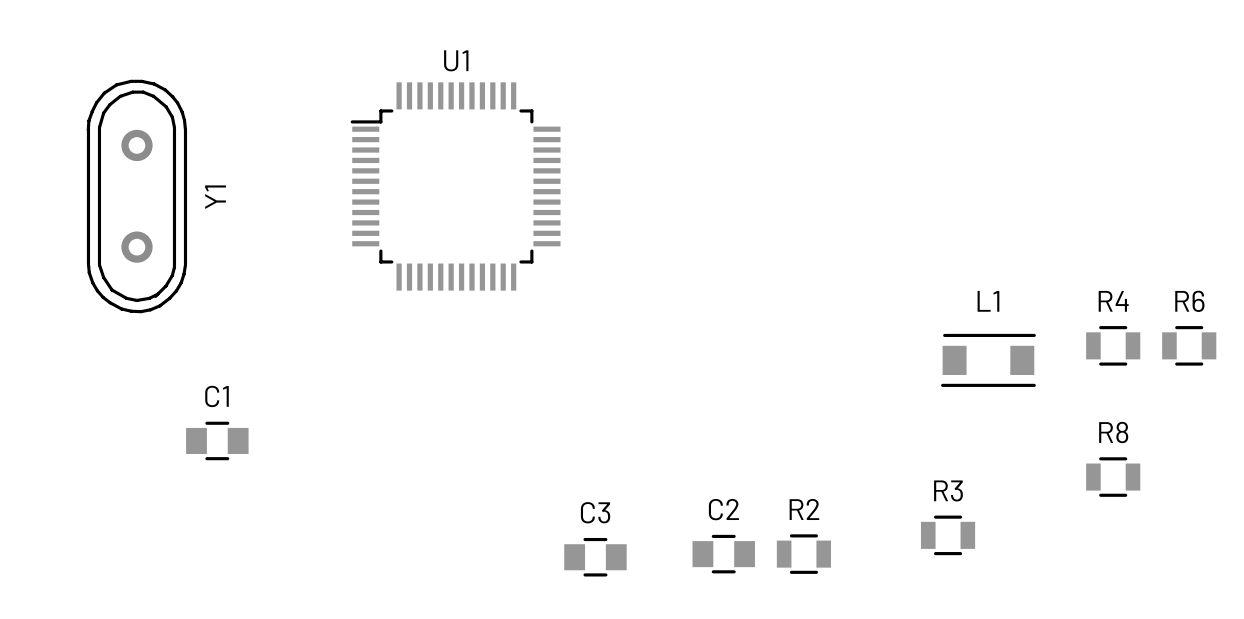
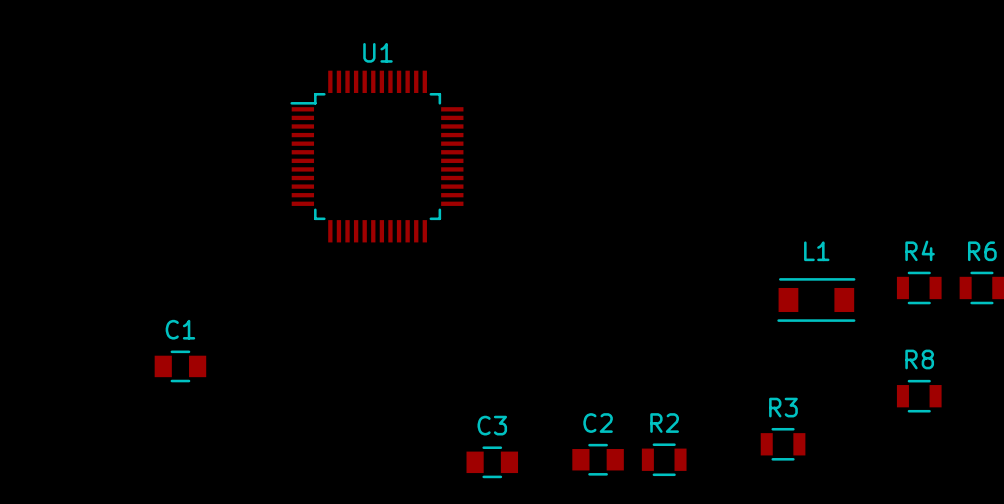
Y1: (136, 196) -> none

